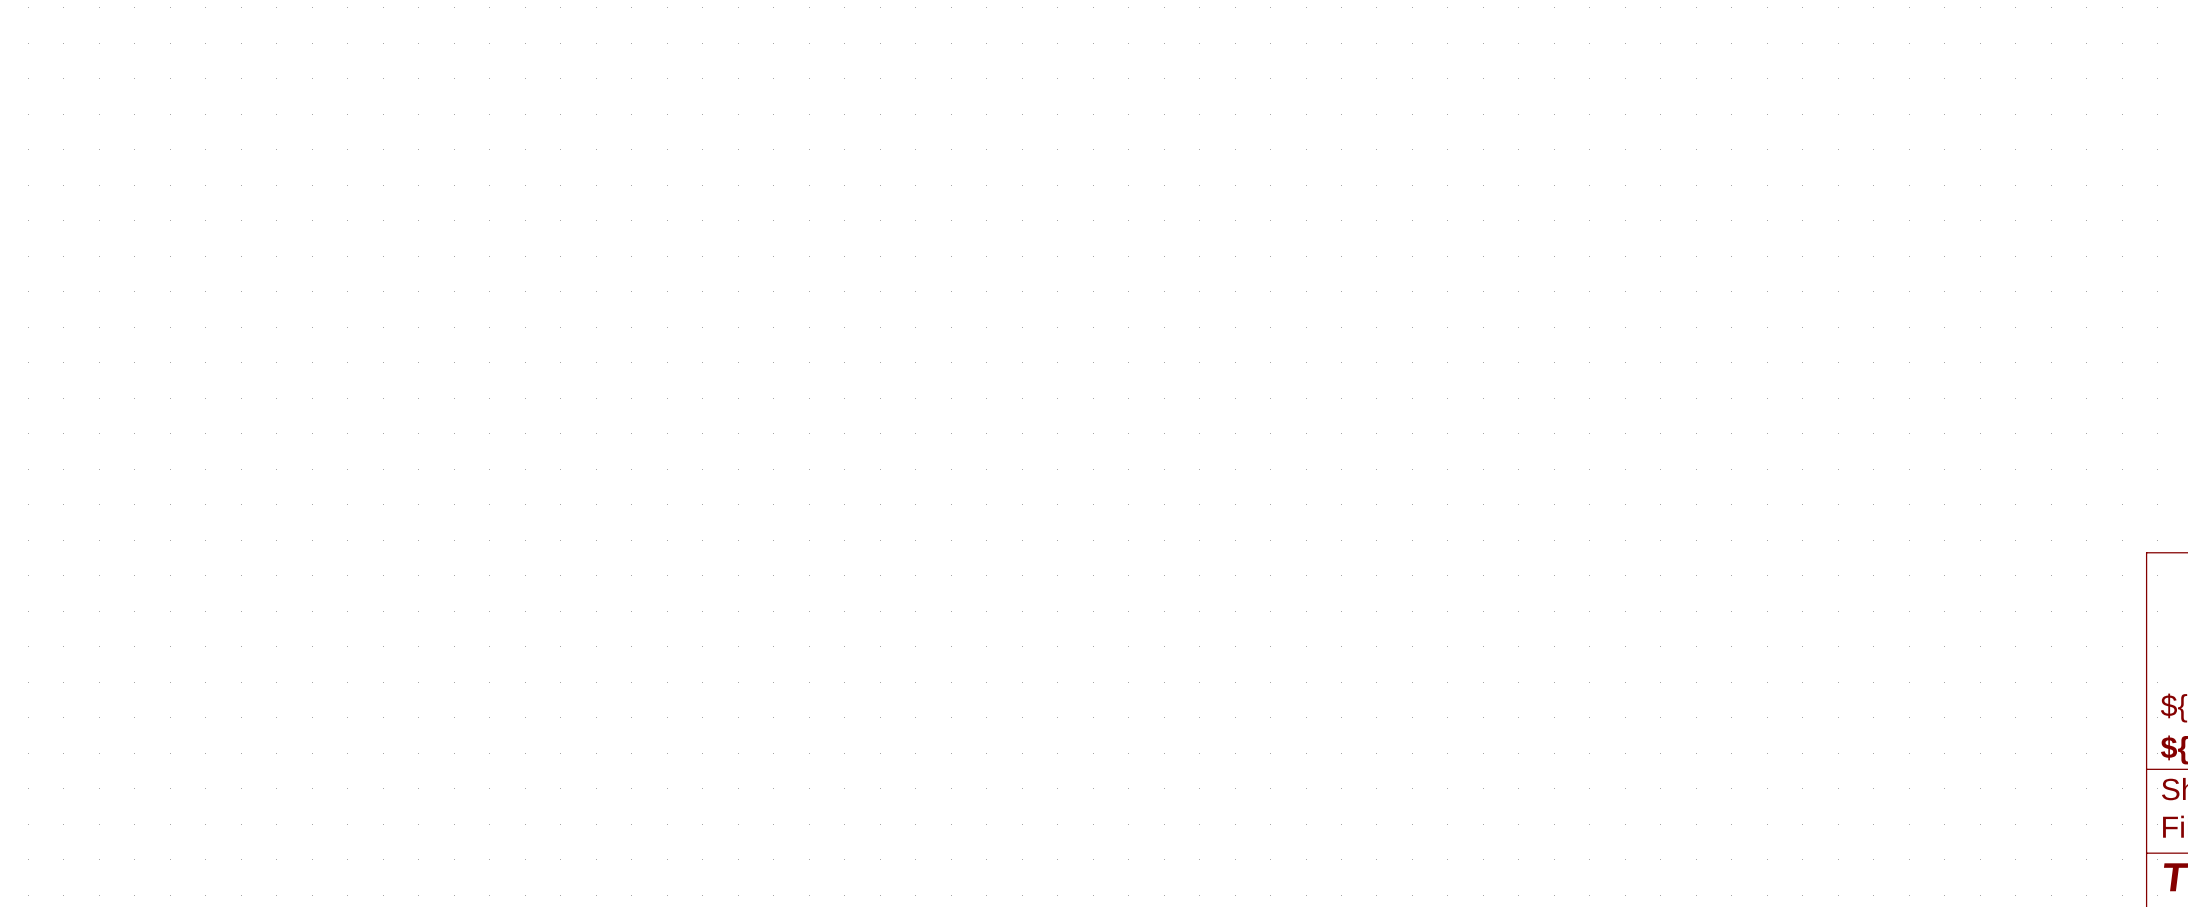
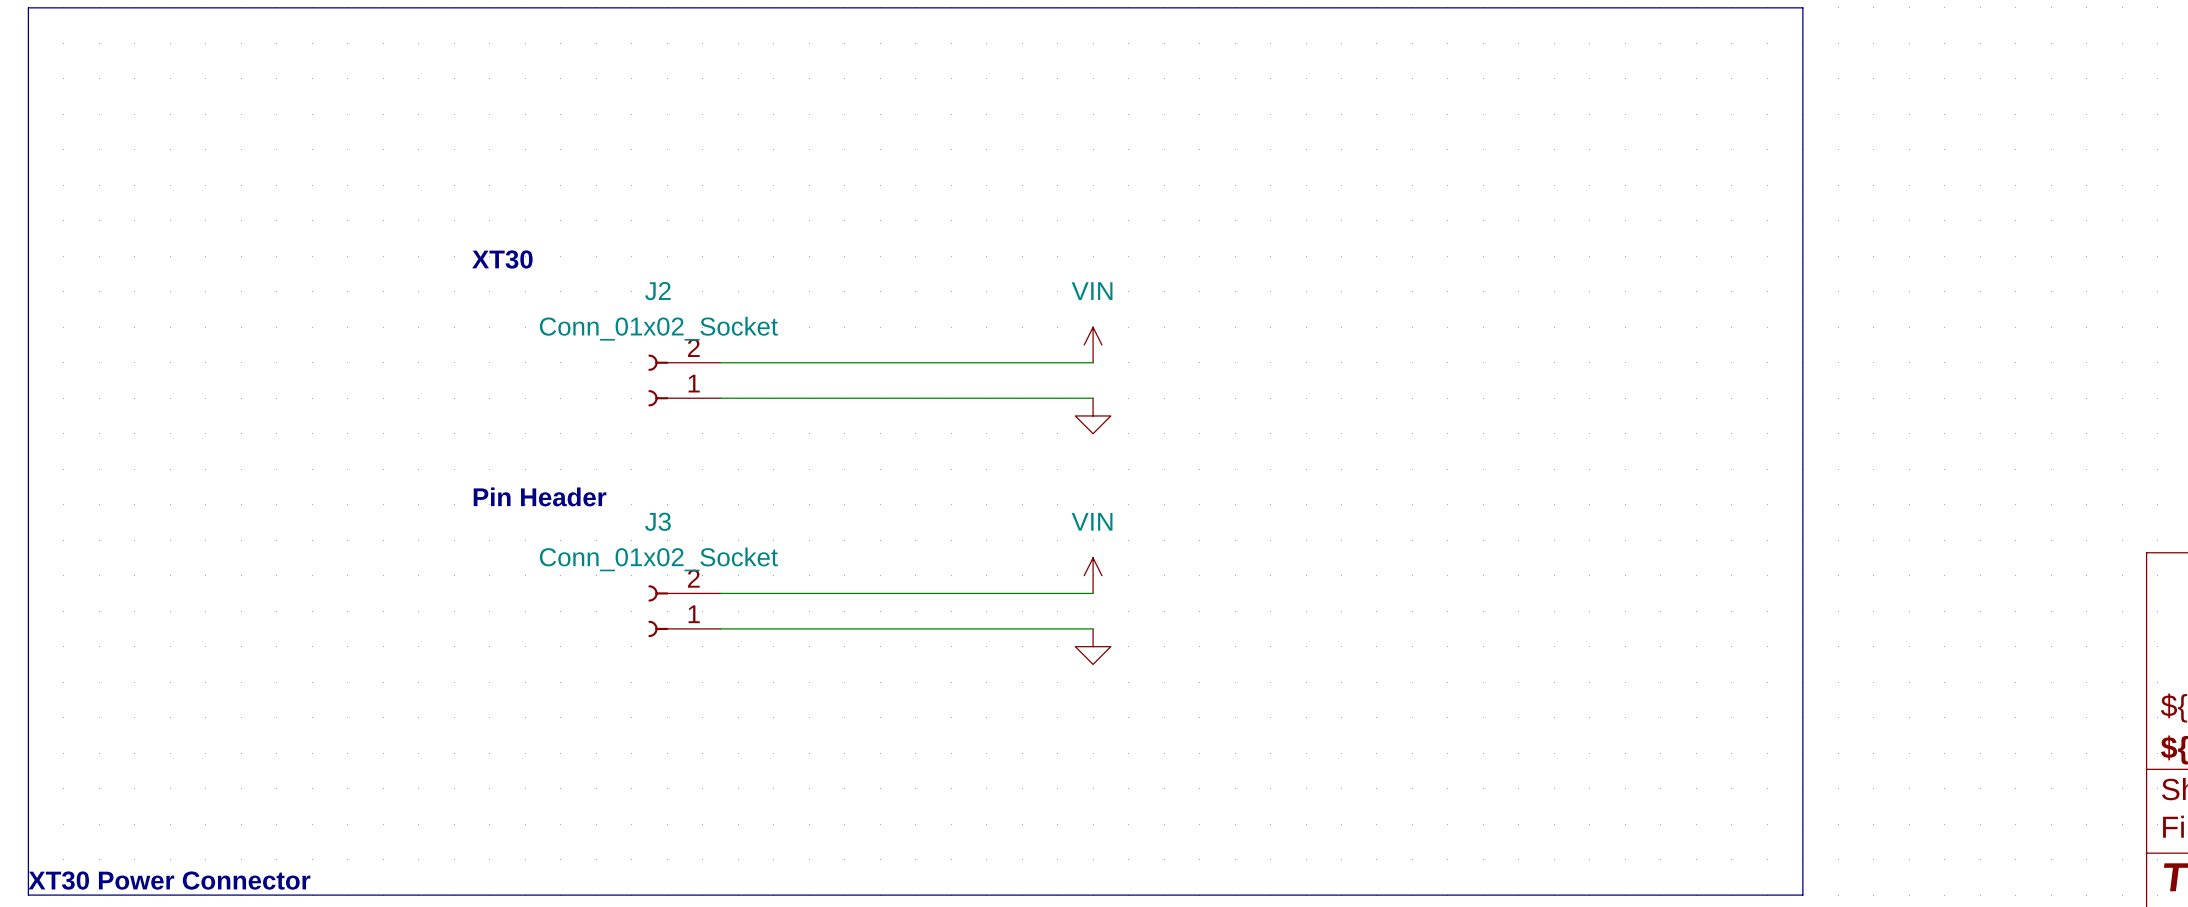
line: none -> (28, 7) (1802, 7) (1802, 895) (28, 895) (28, 7)
text: none -> XT30 (502, 259)
power symbol: none -> VIN (1093, 345)
wire: none -> (720, 362) (1093, 362)
J2: none -> Conn_01x02_Socket (684, 380)
wire: none -> (720, 398) (1093, 398)
power symbol: none -> (1093, 415)
text: none -> Pin Header (540, 496)
power symbol: none -> VIN (1093, 575)
wire: none -> (720, 593) (1093, 593)
J3: none -> Conn_01x02_Socket (684, 611)
wire: none -> (720, 628) (1093, 628)
power symbol: none -> (1093, 646)
text: none -> XT30 Power Connector (169, 880)

